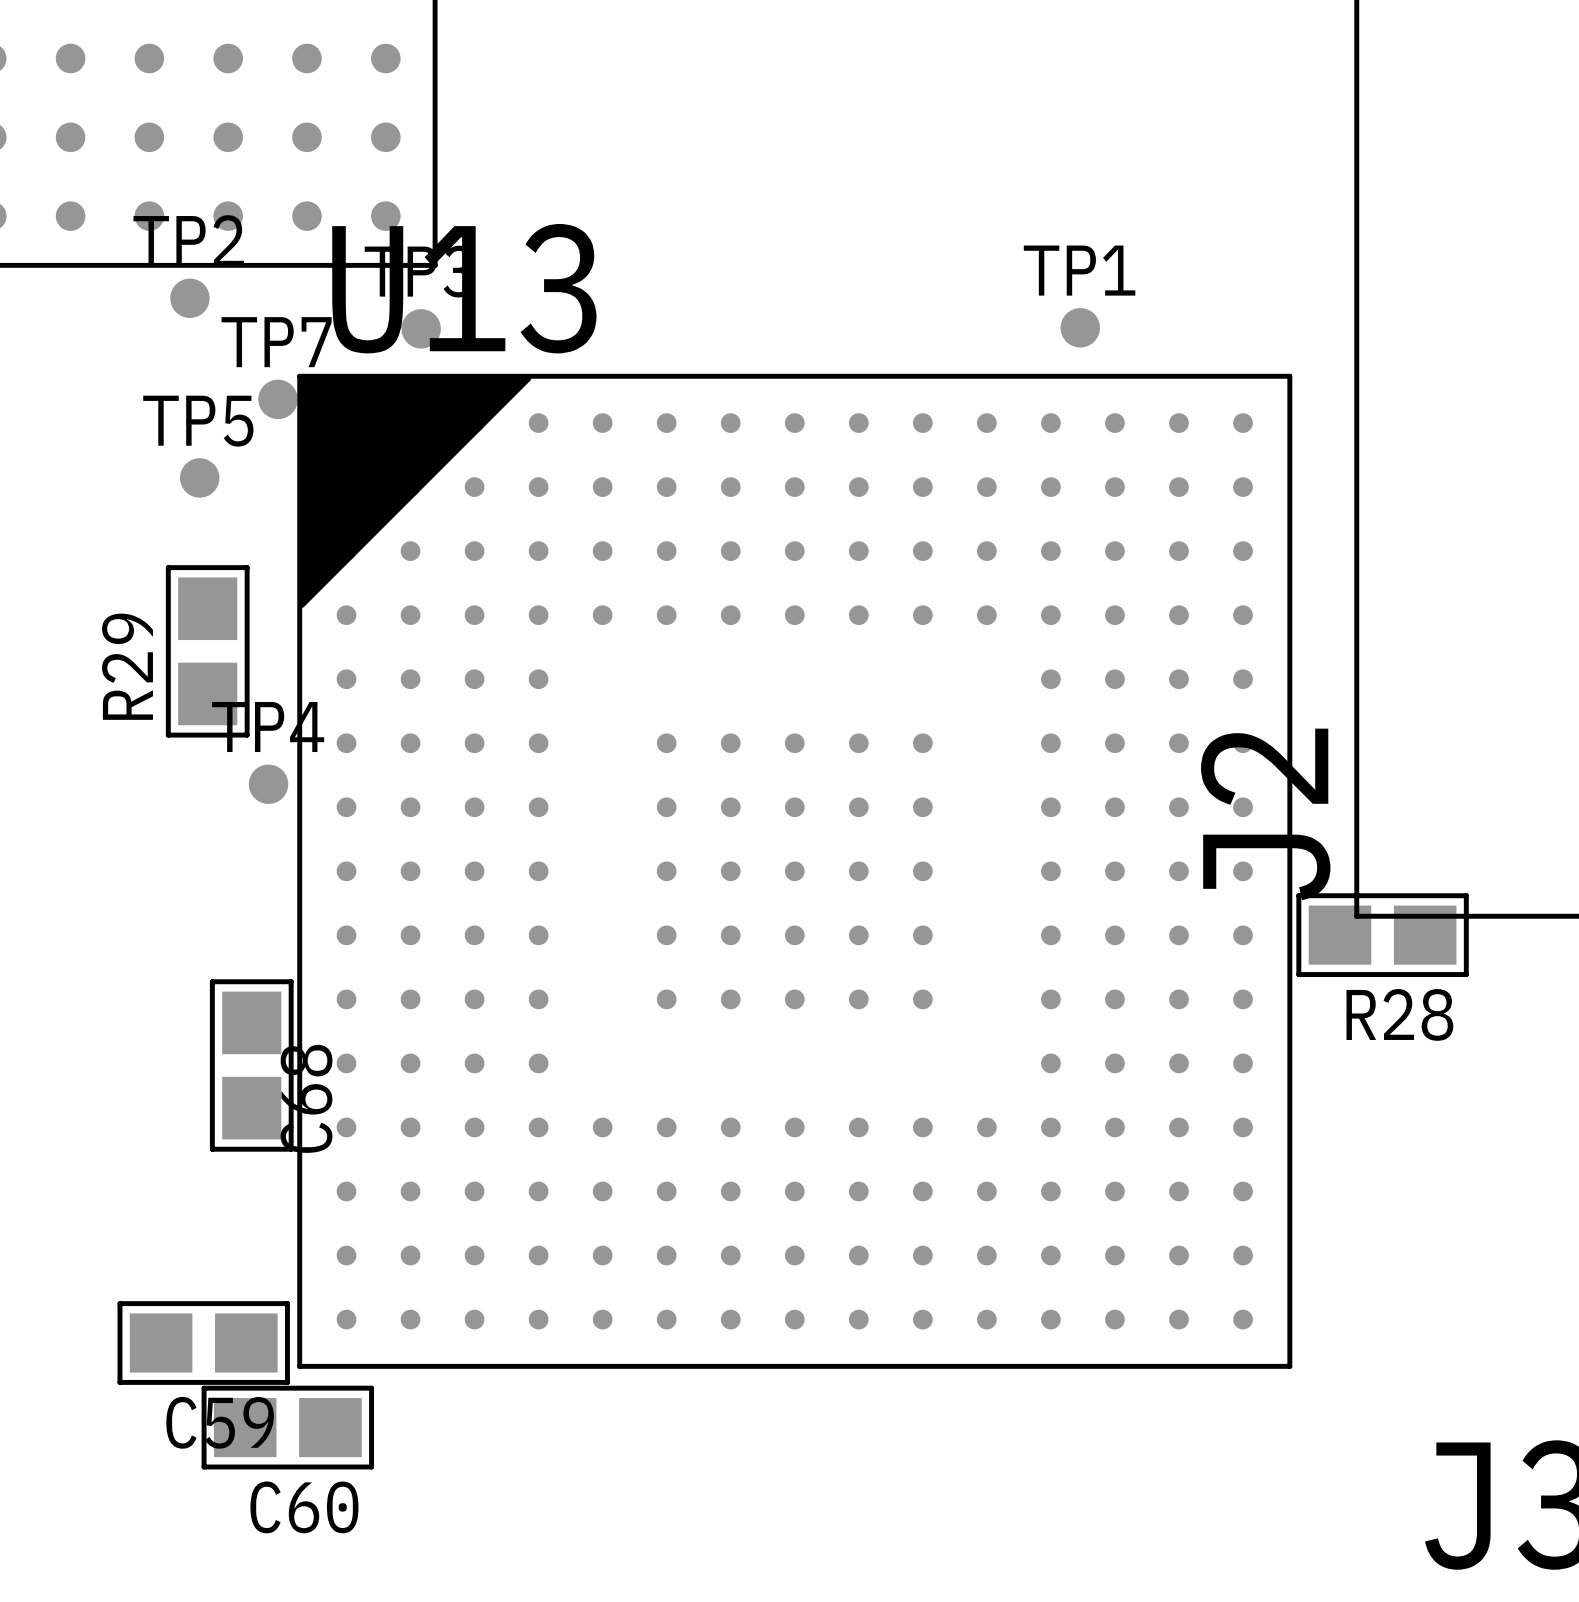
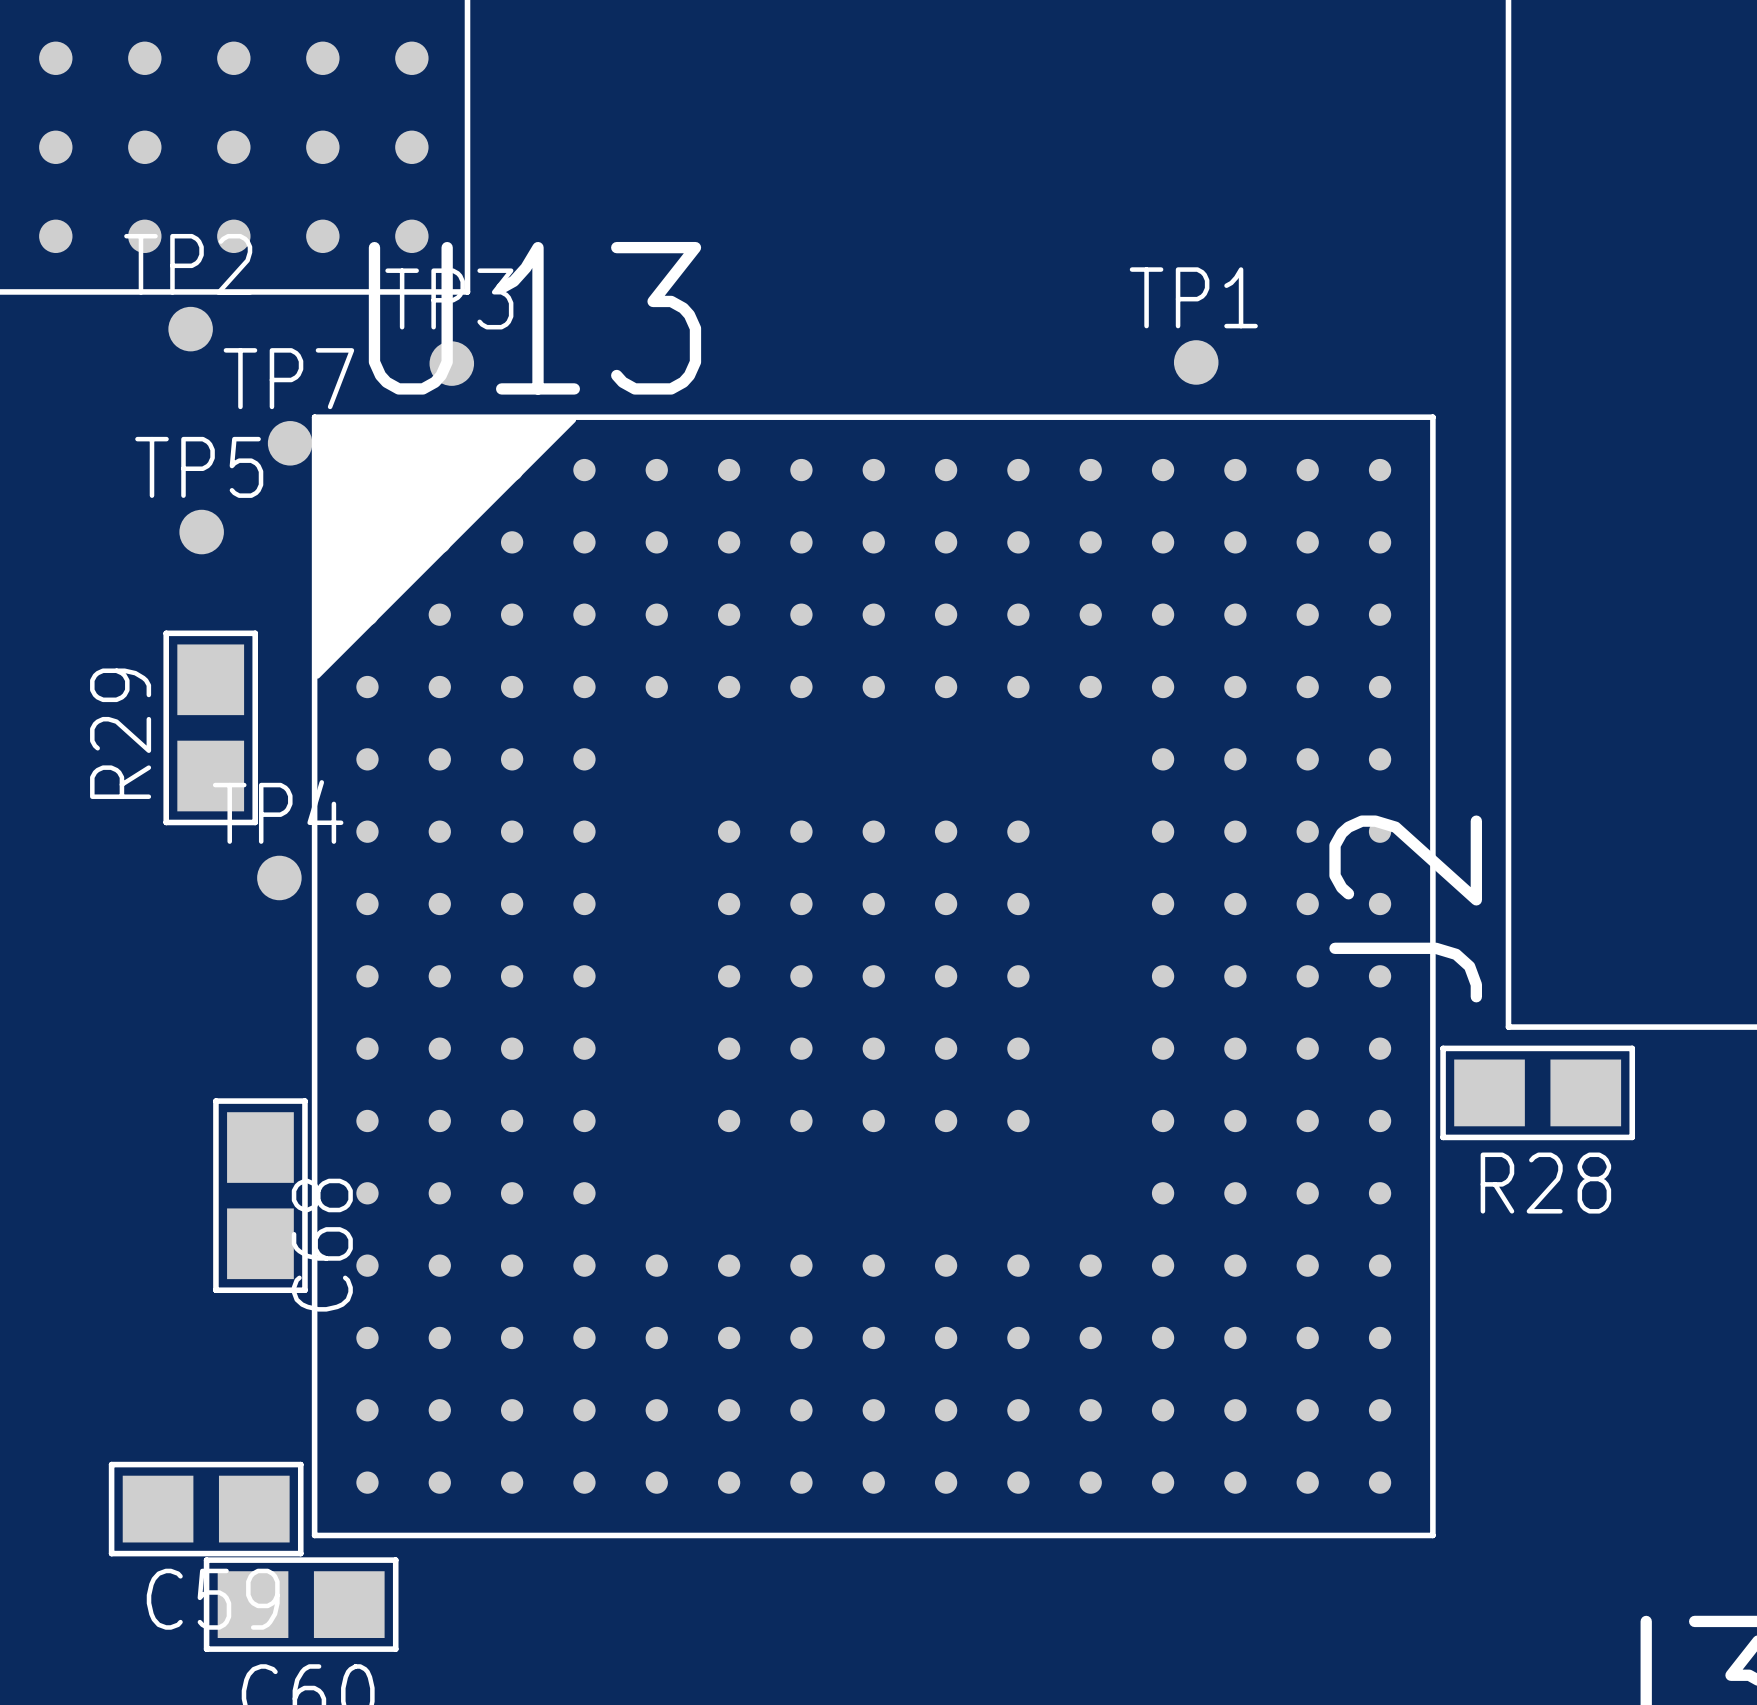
R28 position: (1382, 935) -> (1537, 1092)

